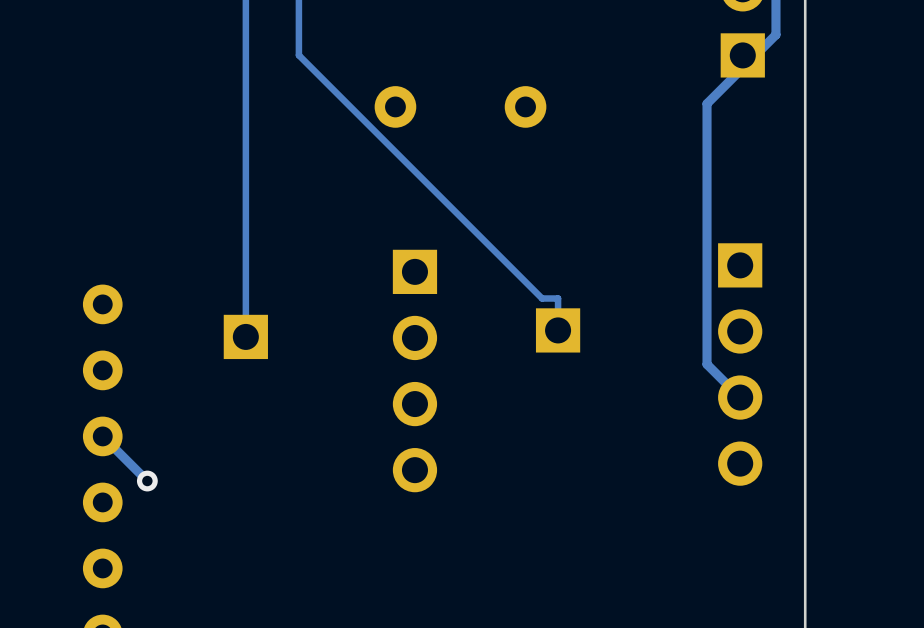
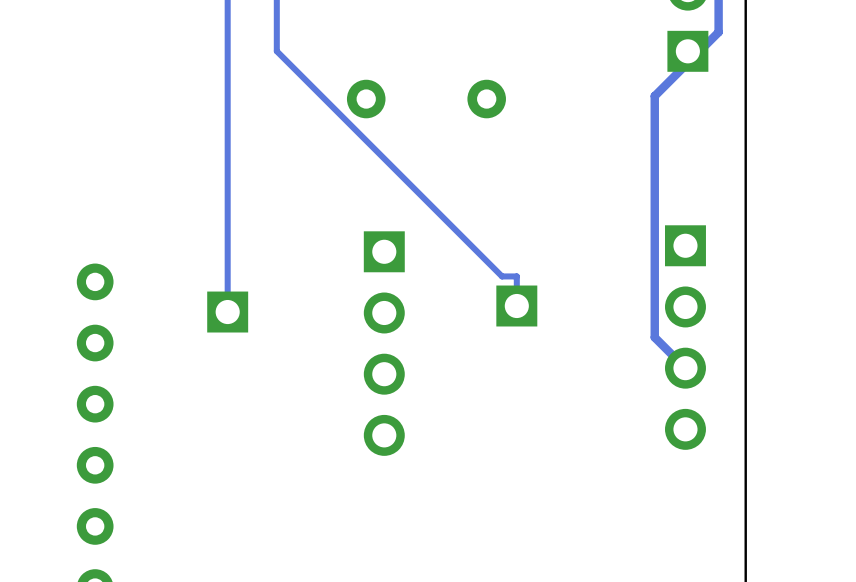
track: (102, 436) (147, 481) -> none
via: (147, 481) -> none

